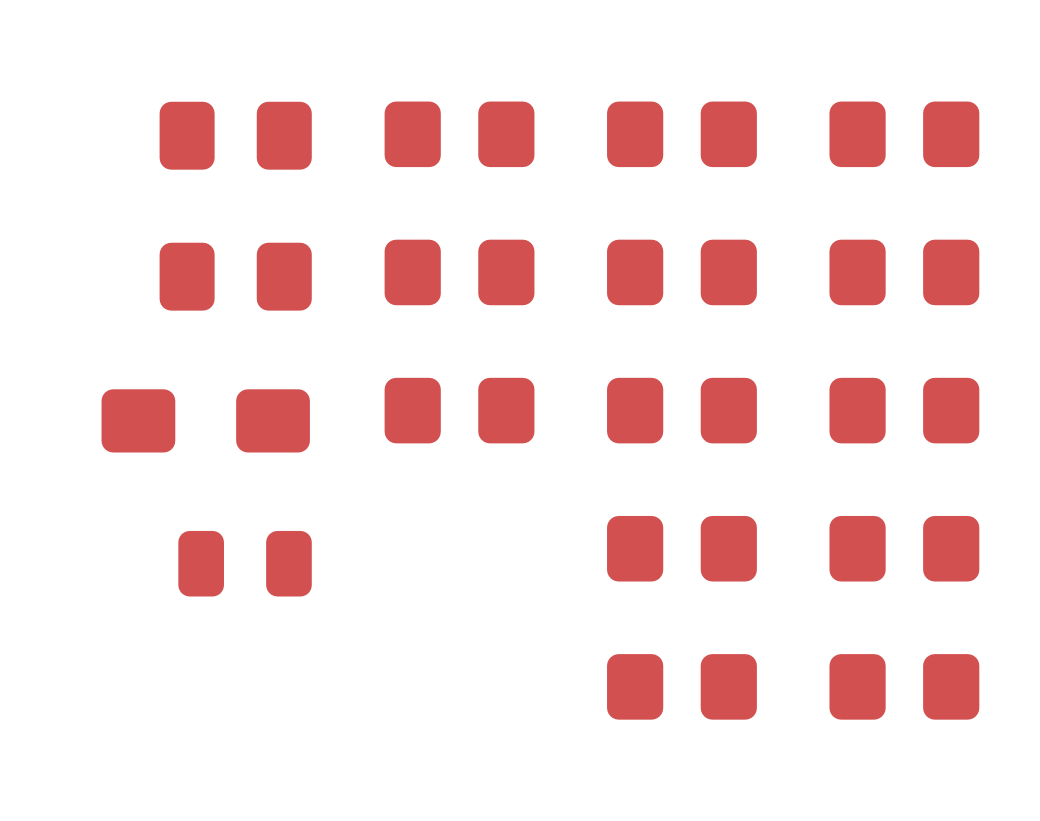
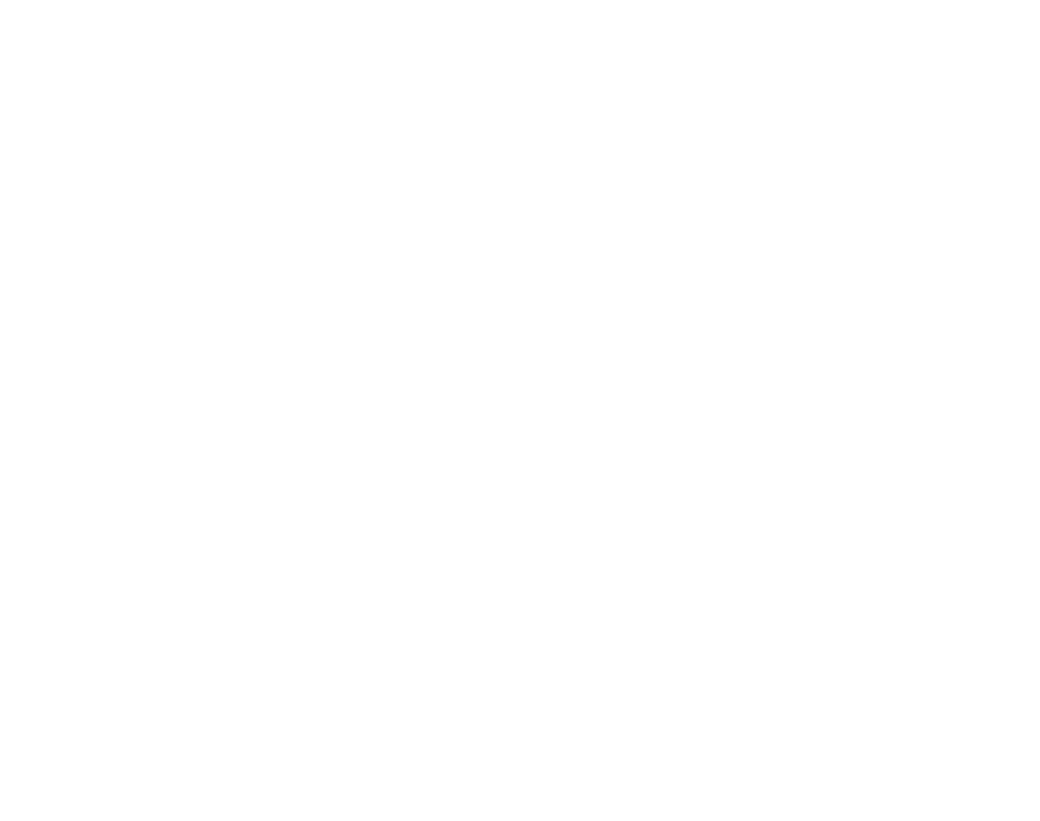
part: (459, 134) -> none
part: (681, 134) -> none
part: (904, 134) -> none
part: (235, 135) -> none
part: (459, 272) -> none
part: (681, 272) -> none
part: (904, 272) -> none
part: (235, 276) -> none
part: (459, 410) -> none
part: (681, 410) -> none
part: (904, 410) -> none
part: (205, 420) -> none
part: (681, 548) -> none
part: (904, 548) -> none
part: (245, 563) -> none
part: (681, 686) -> none
part: (904, 686) -> none

